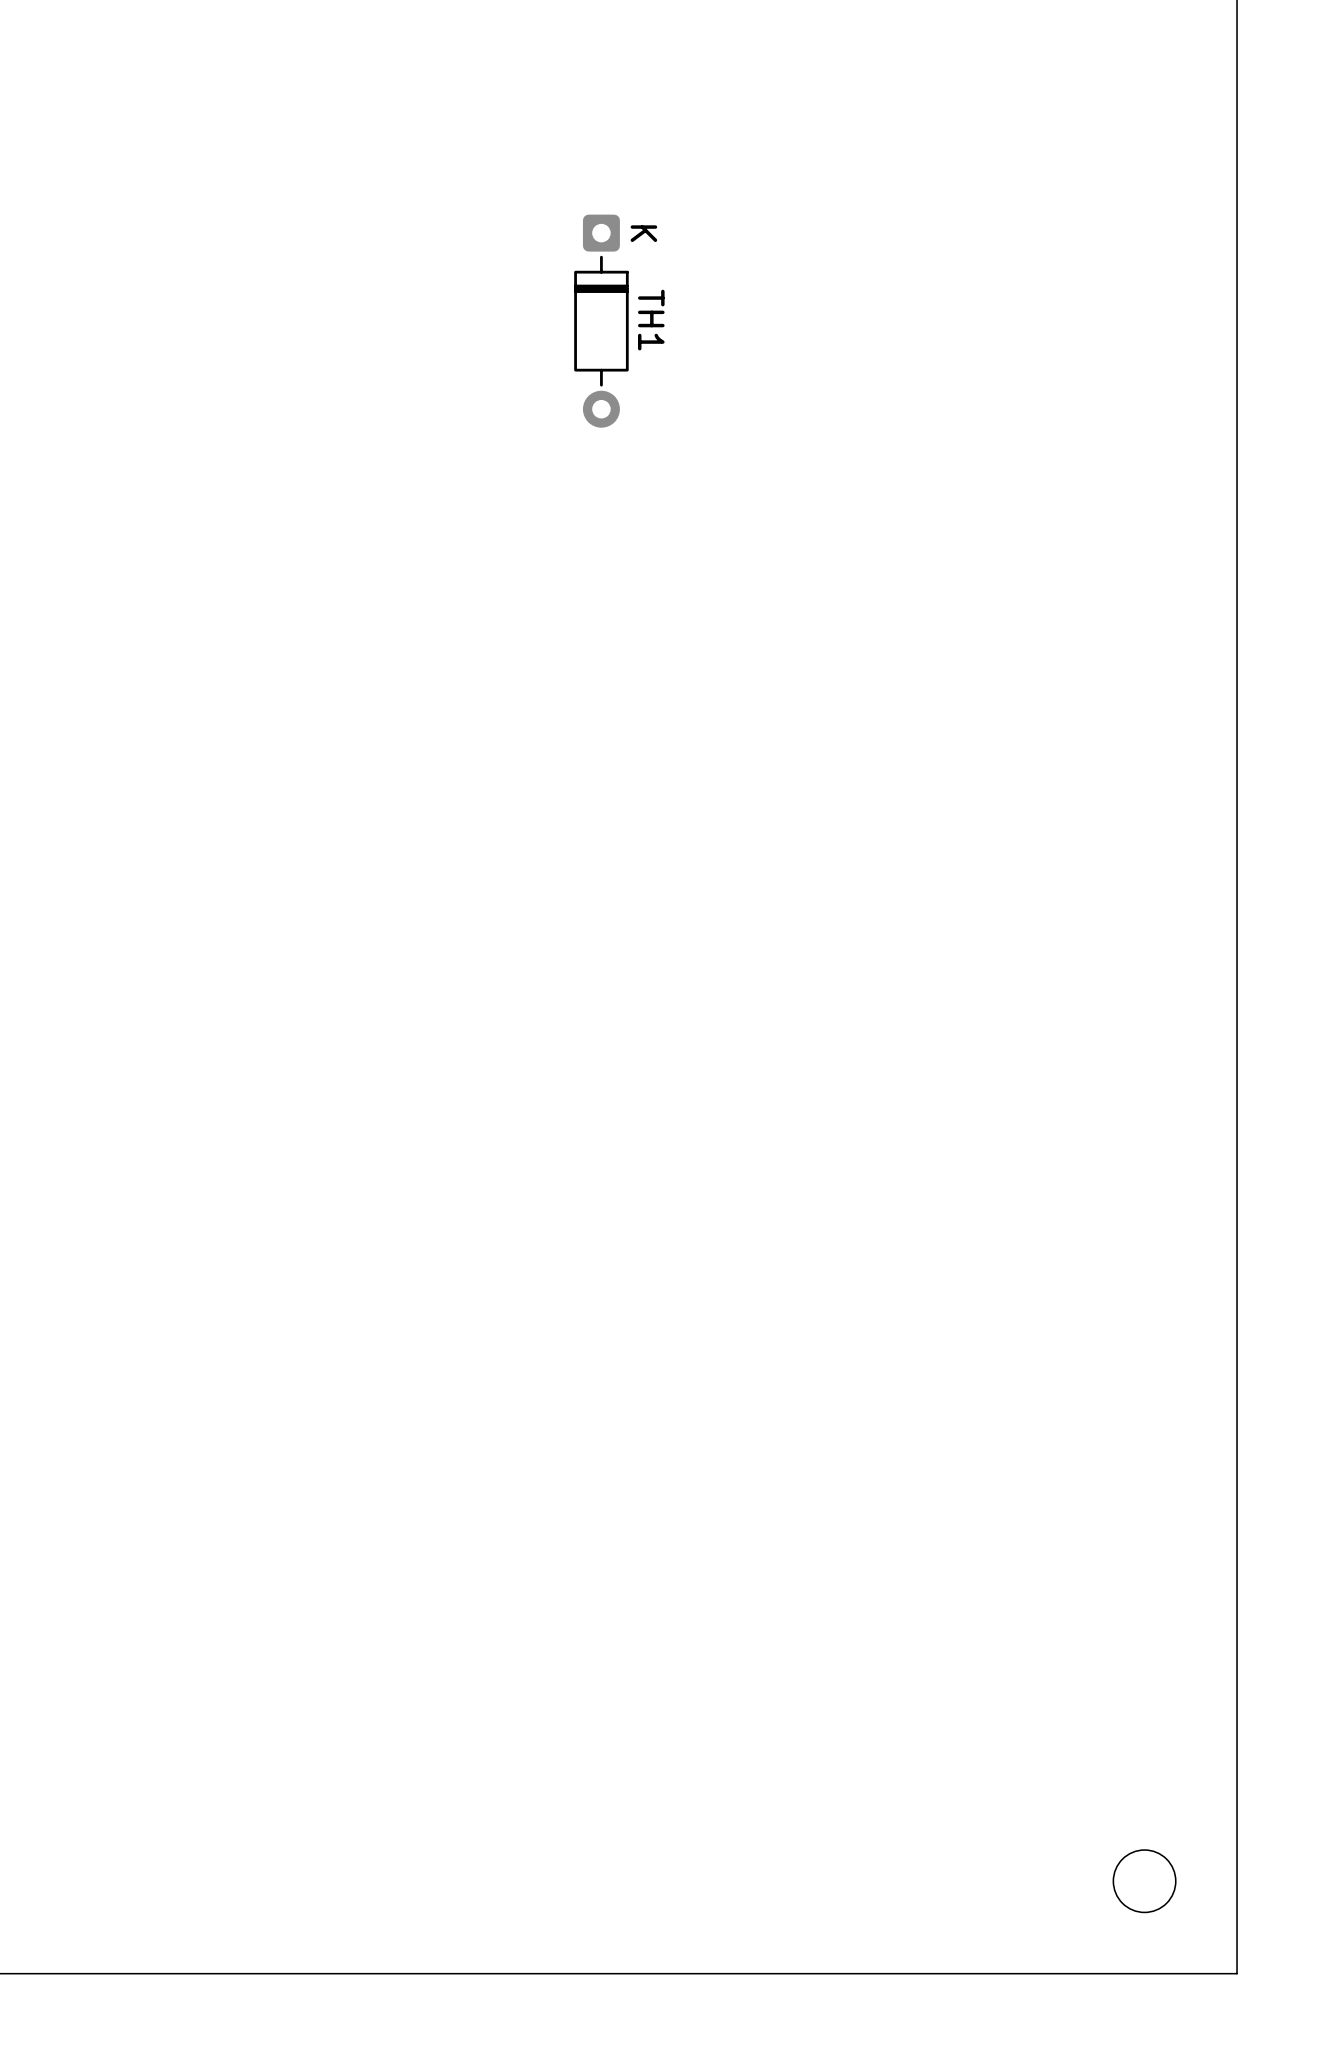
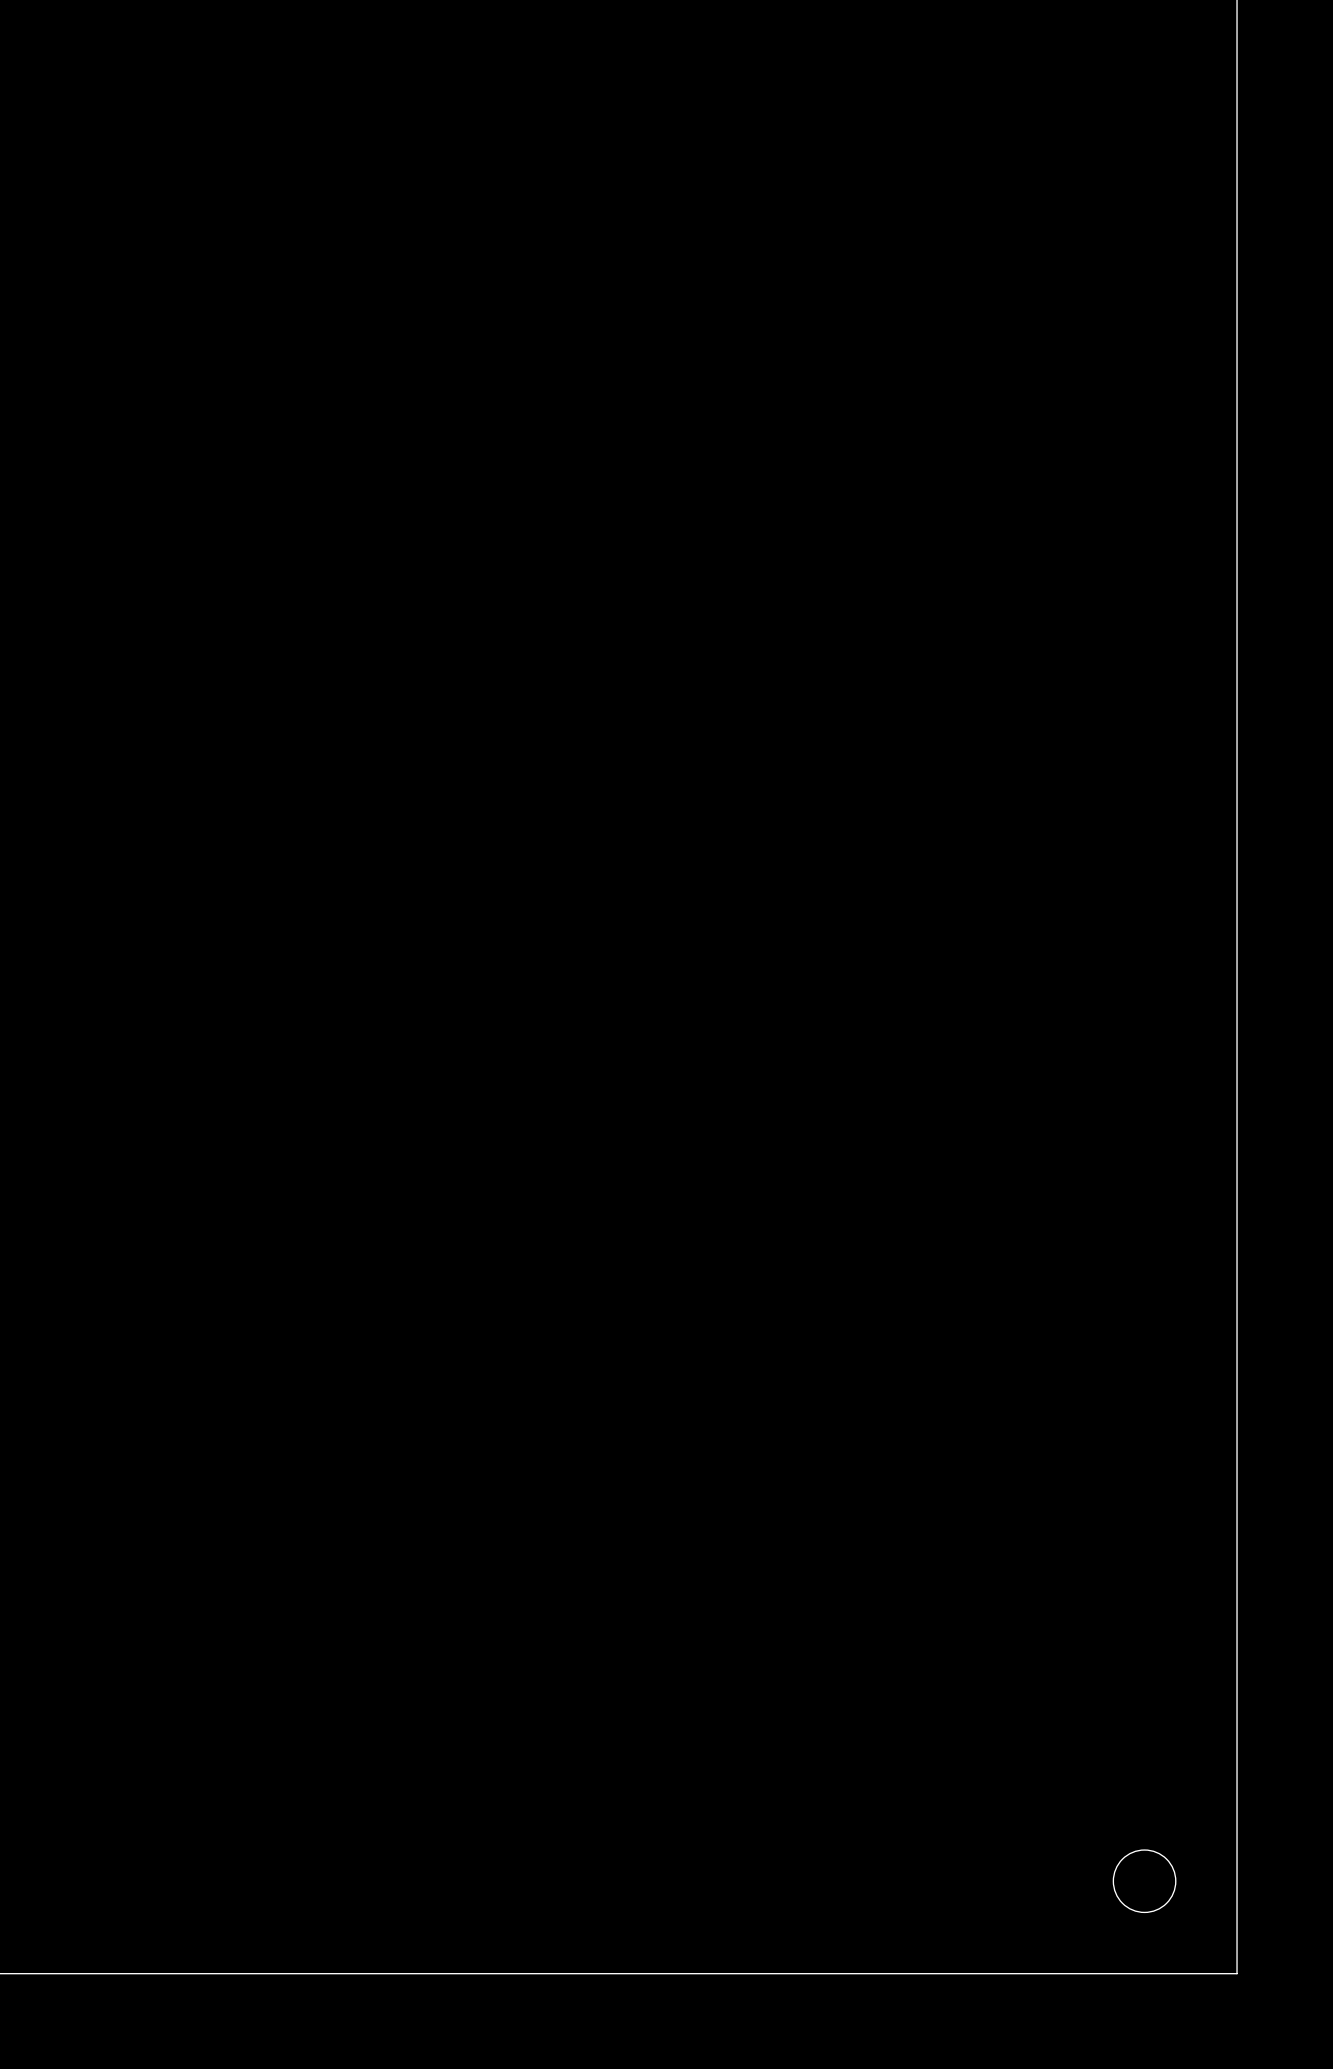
TH1: (601, 321) -> none

